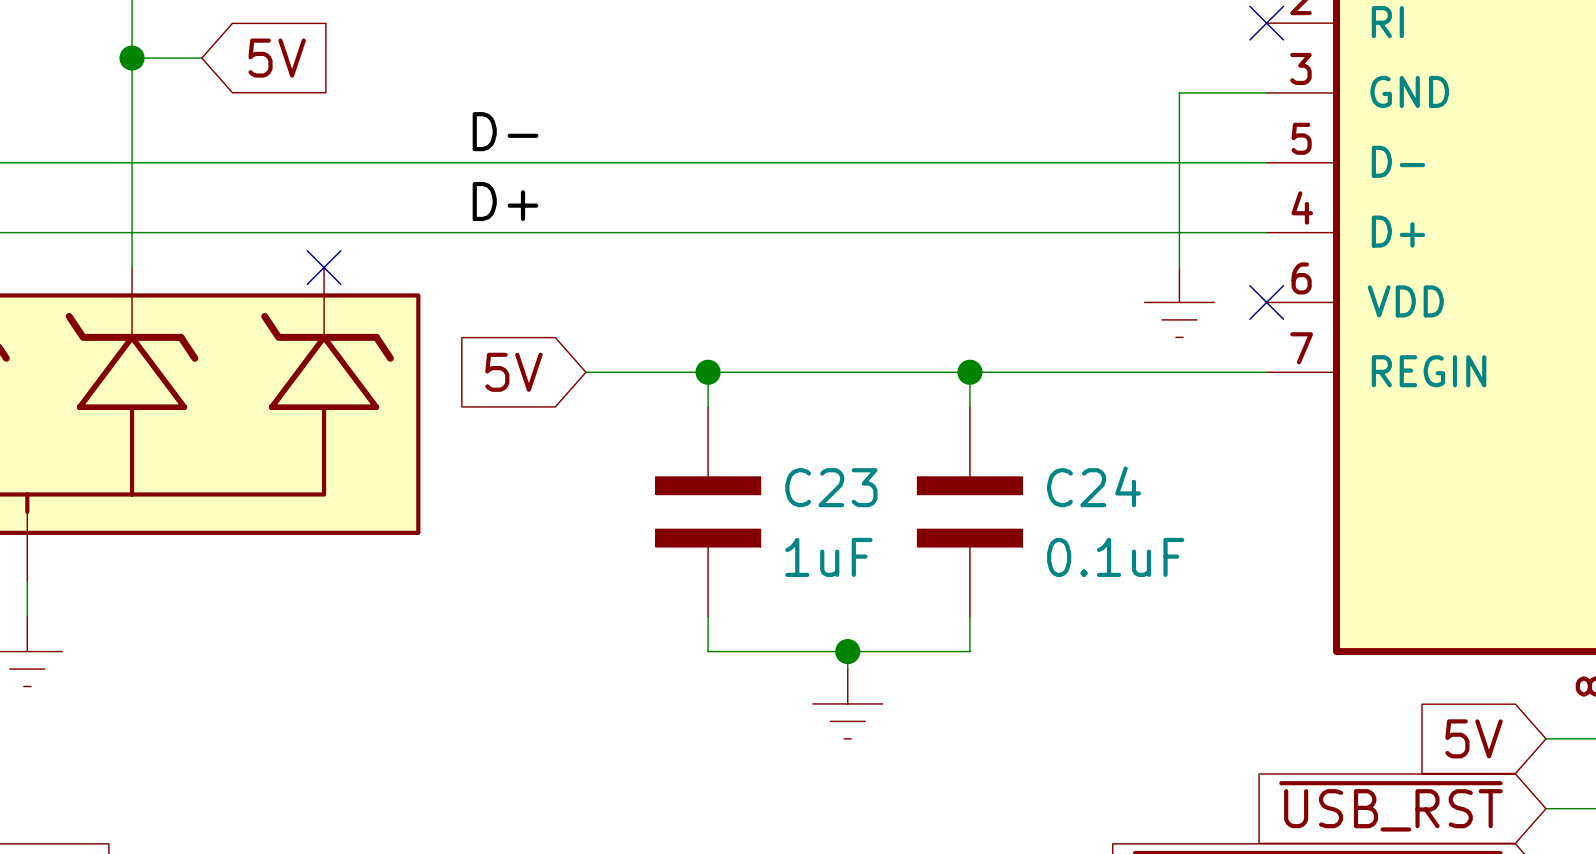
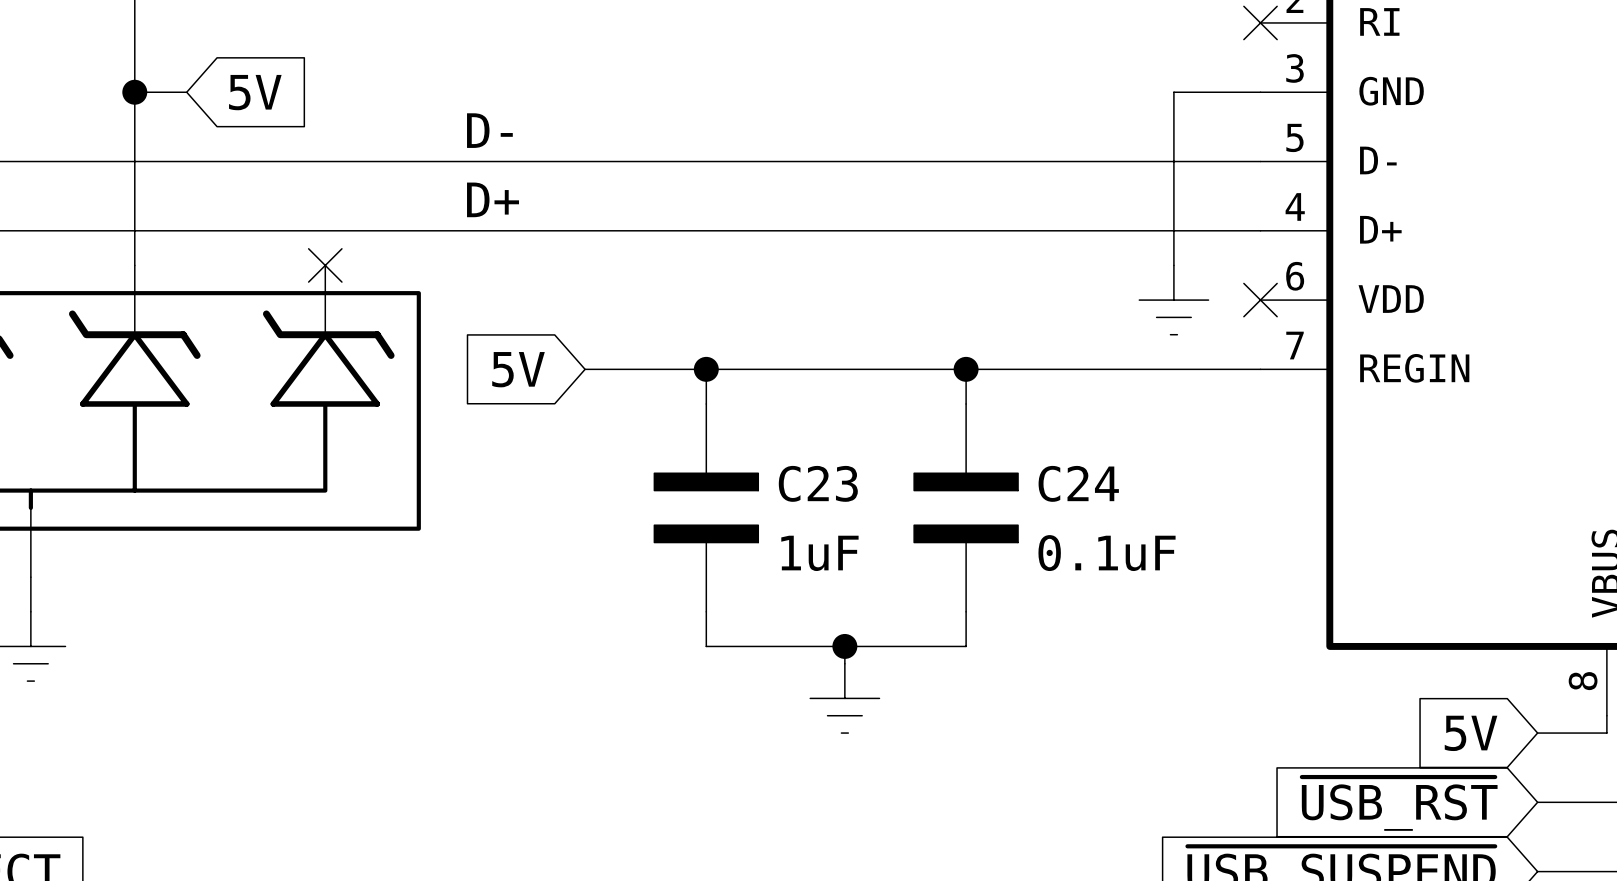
wire: (132, 58) (201, 58) -> none
junction position: (132, 58) -> (134, 92)
global label position: 5V (277, 58) -> 5V (255, 92)
wire: none -> (134, 92) (186, 92)

